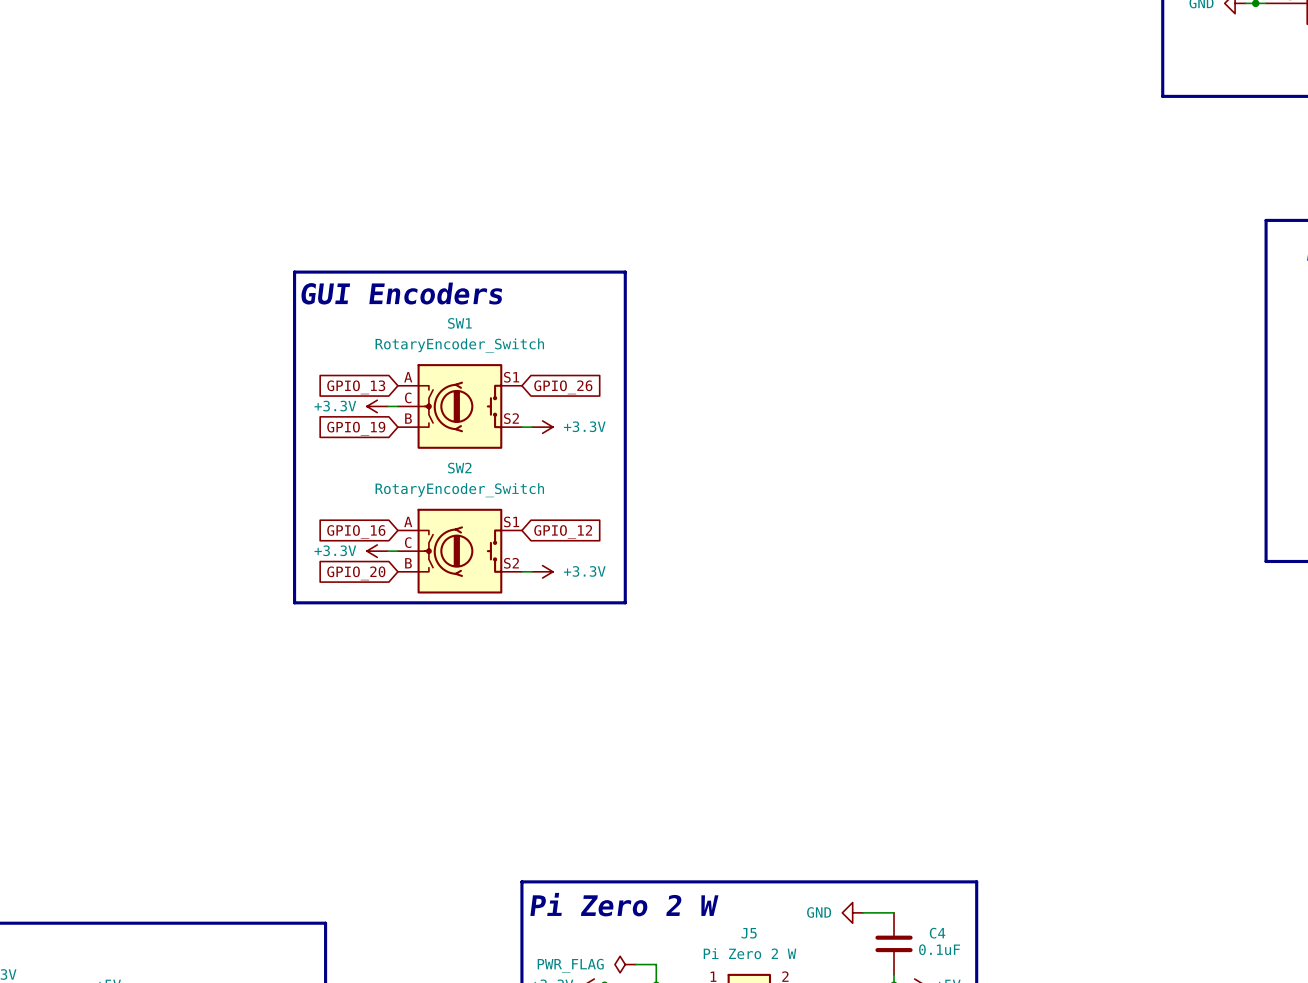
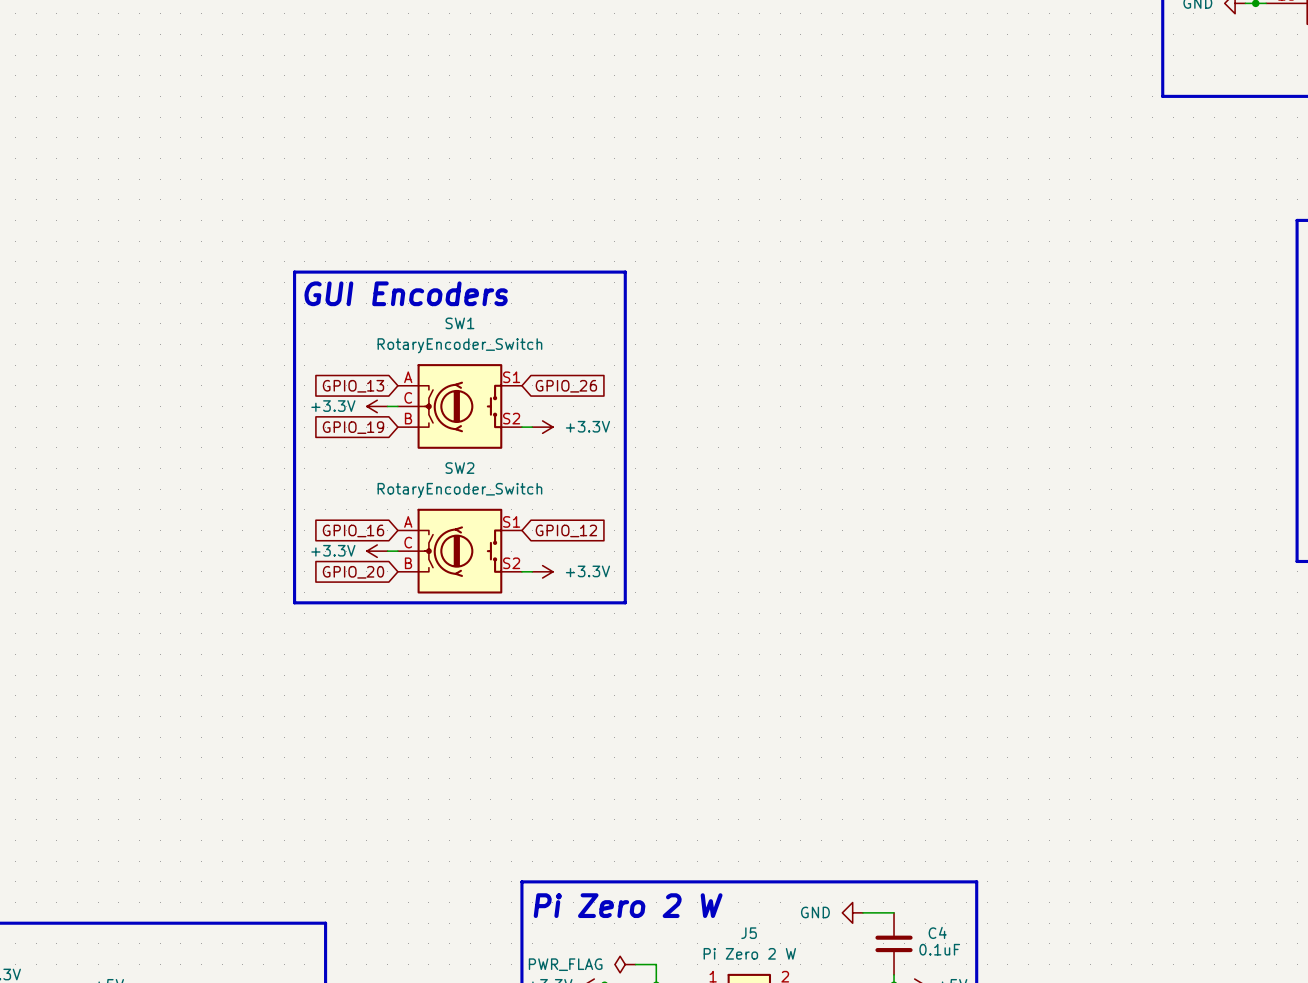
line: (1297, 220) (1266, 220) (1266, 561) (1297, 561) -> (1297, 220) (1297, 561)

